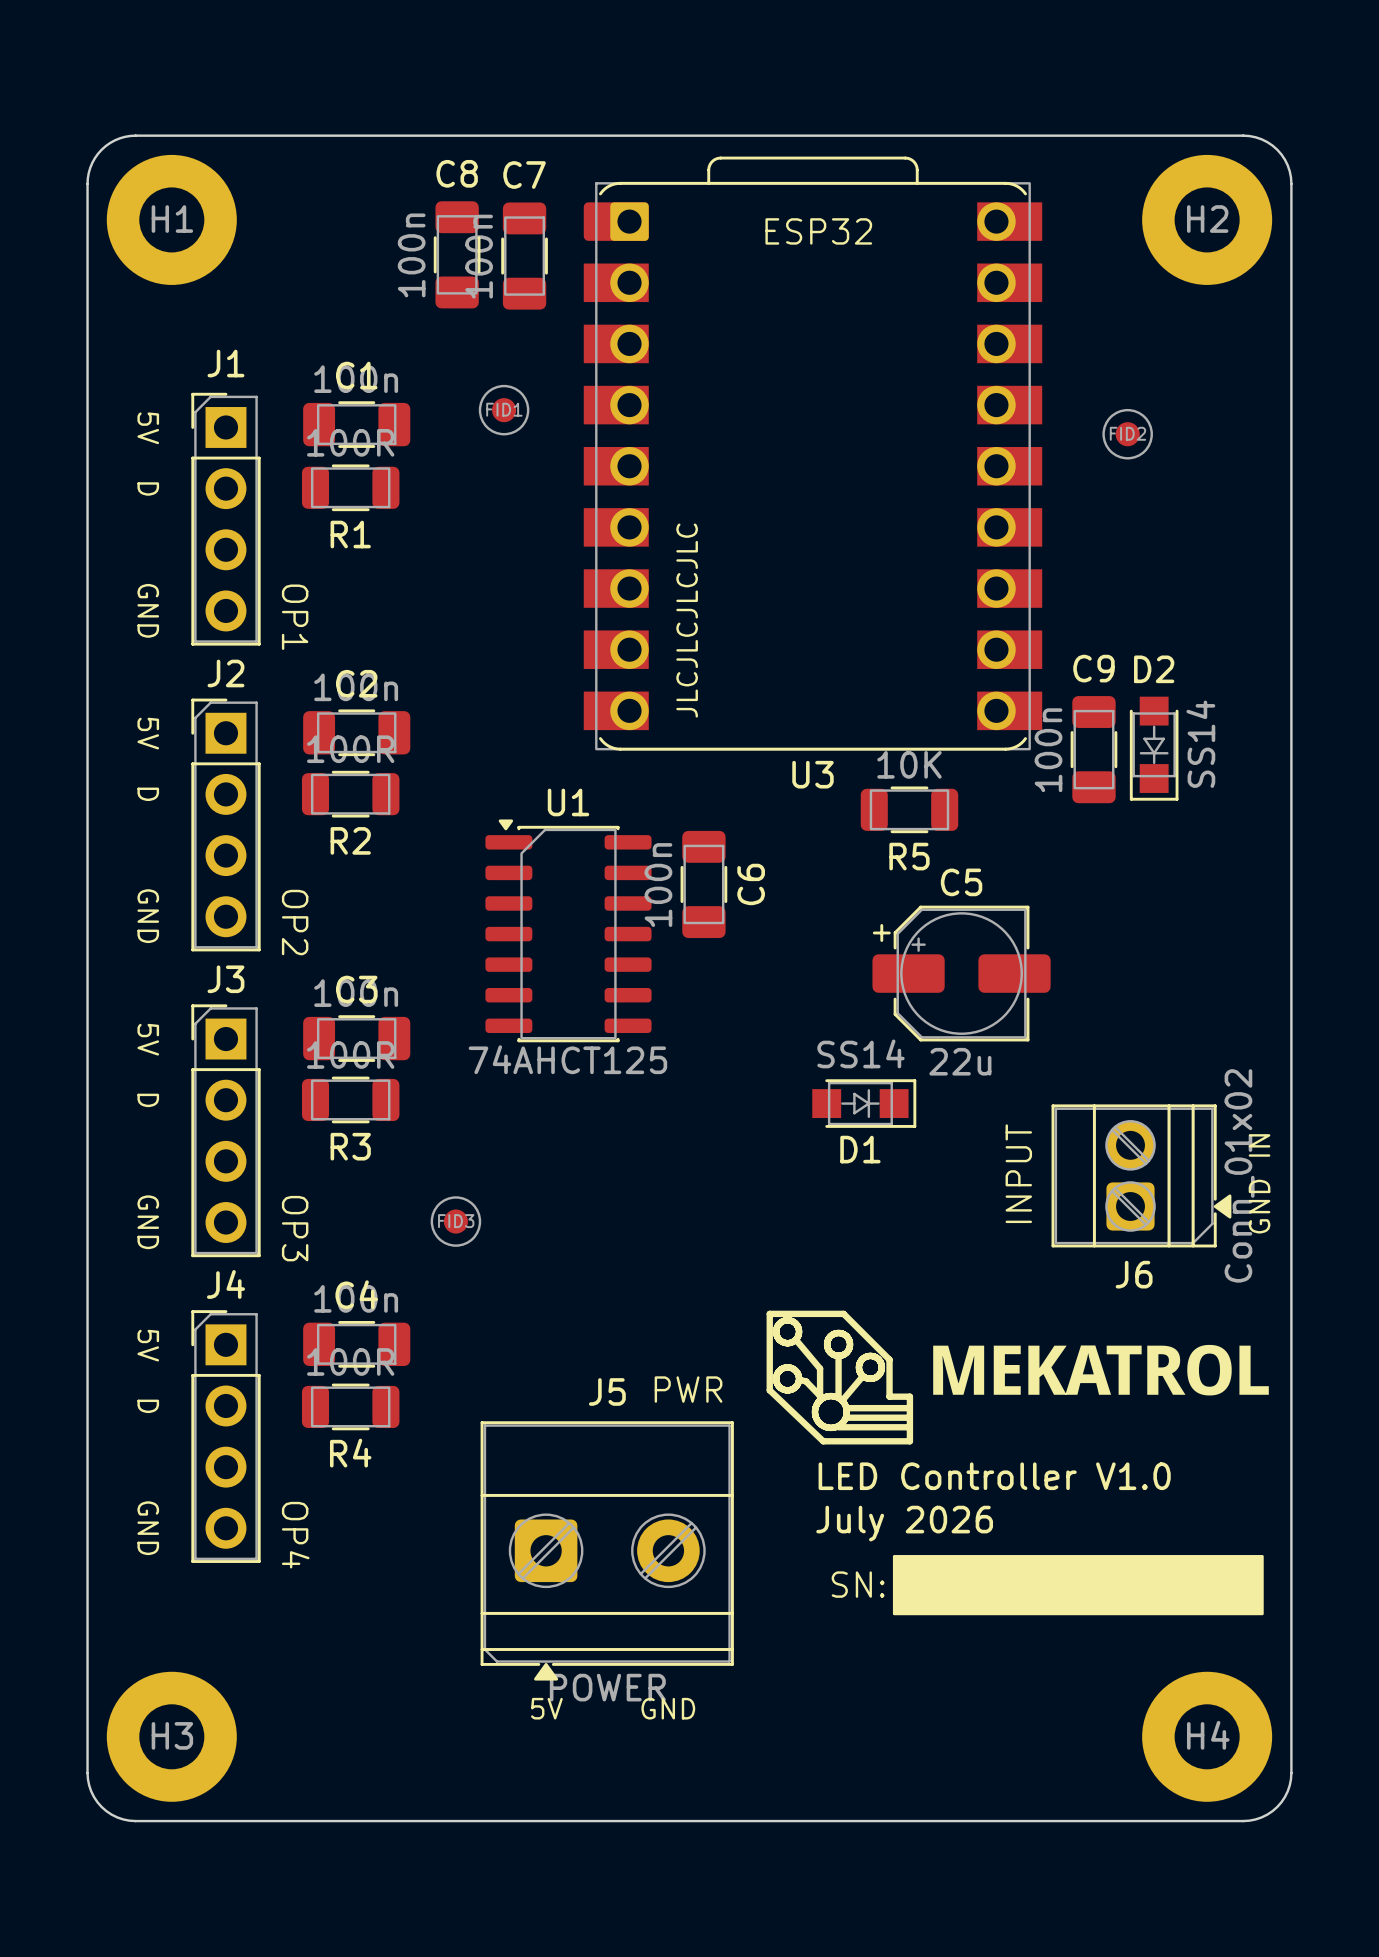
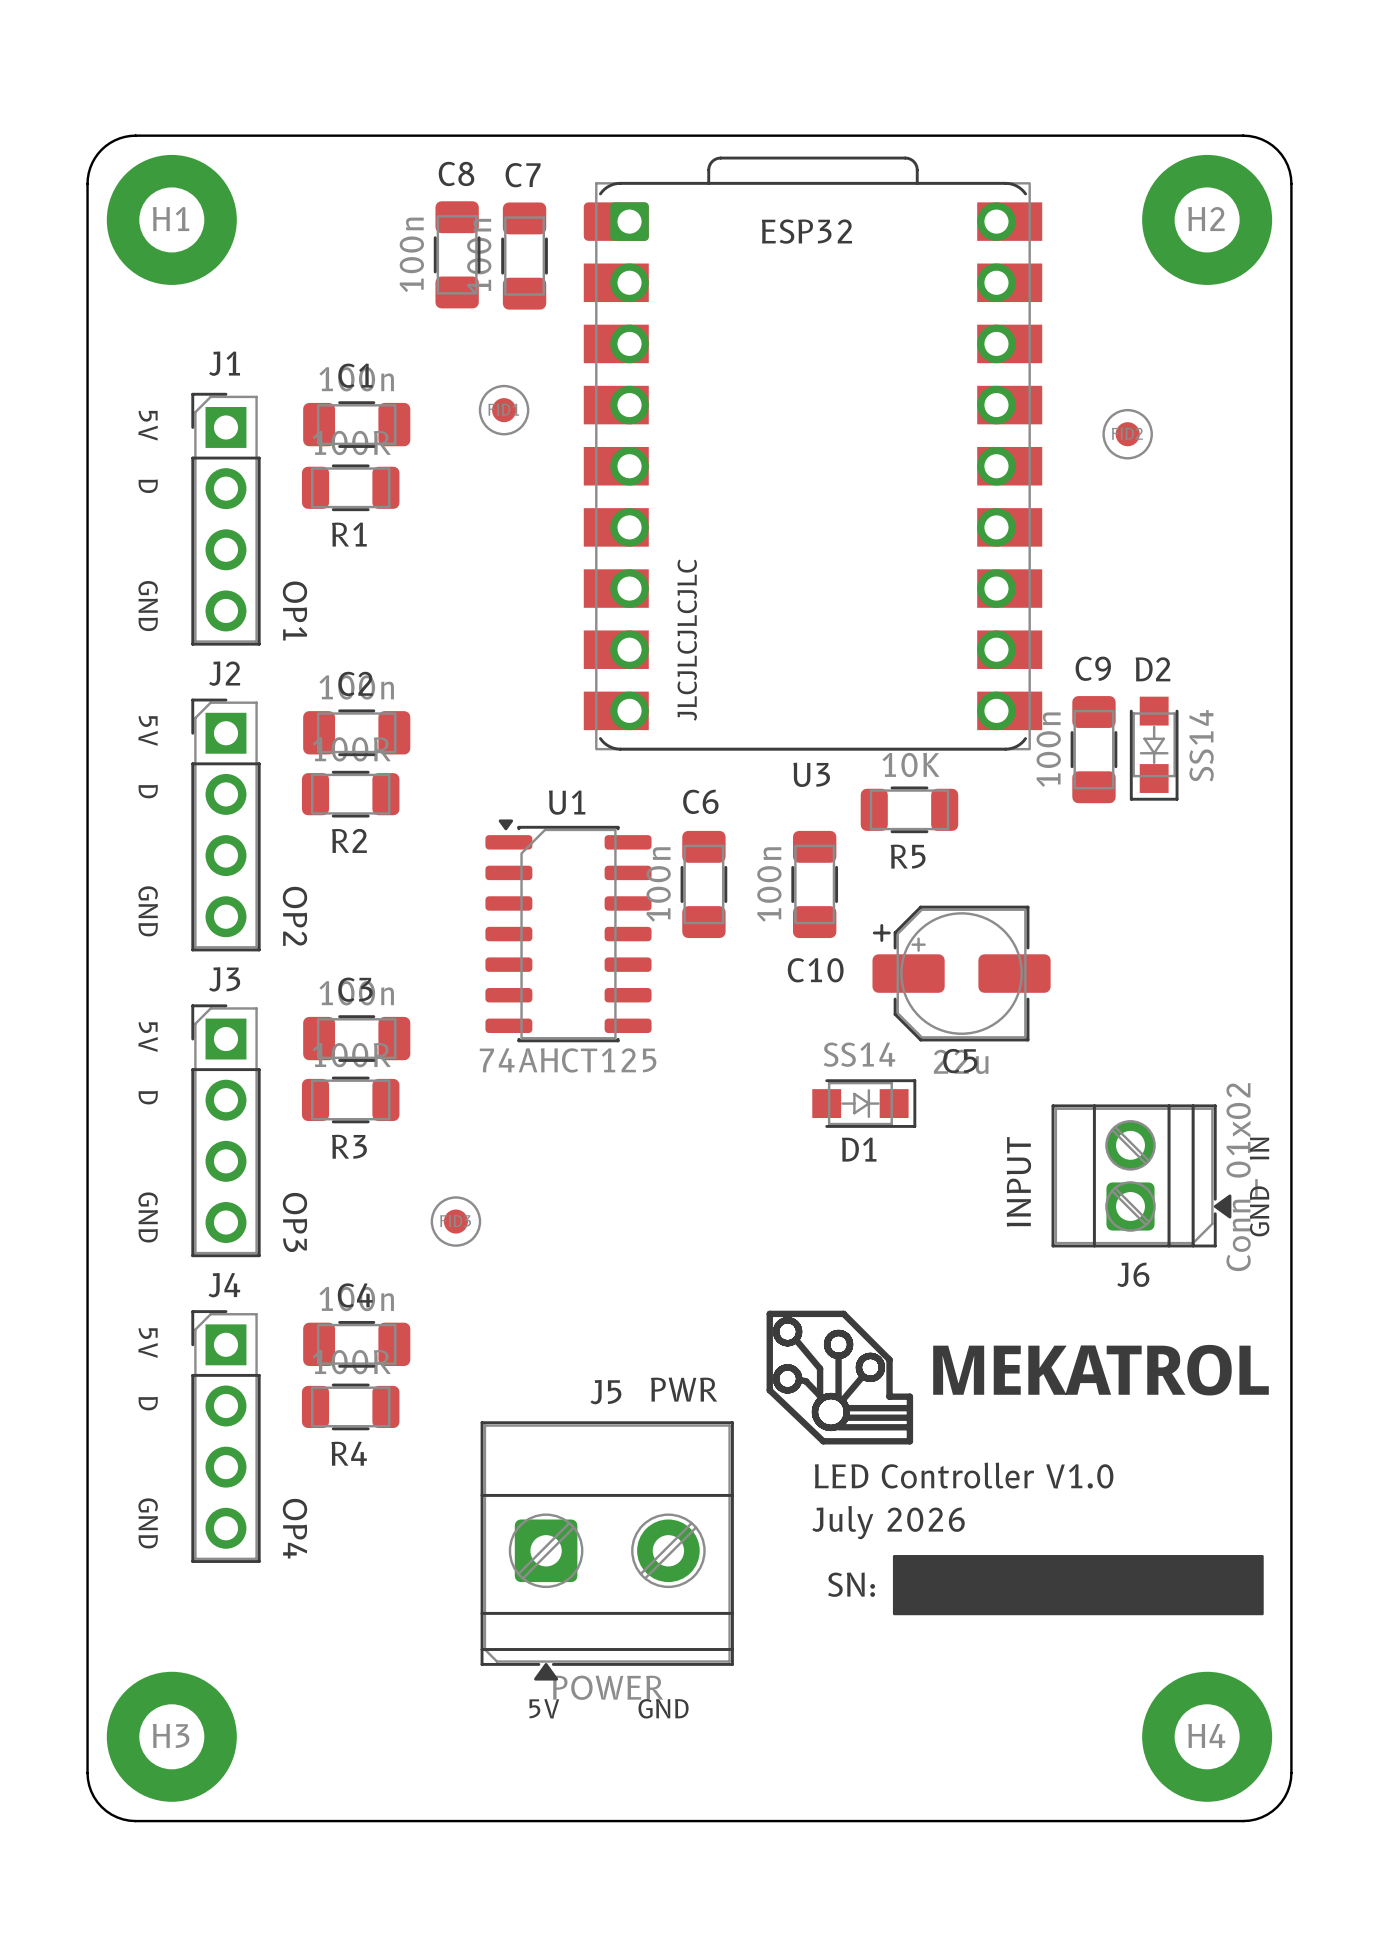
C5 name position: C5 (961, 882) -> C5 (960, 1061)
C6 name rotation: 0° (751, 884) -> 90° clockwise (700, 801)
C6 name position: C6 (751, 884) -> C6 (700, 801)
C10: none -> 100n (814, 884)

